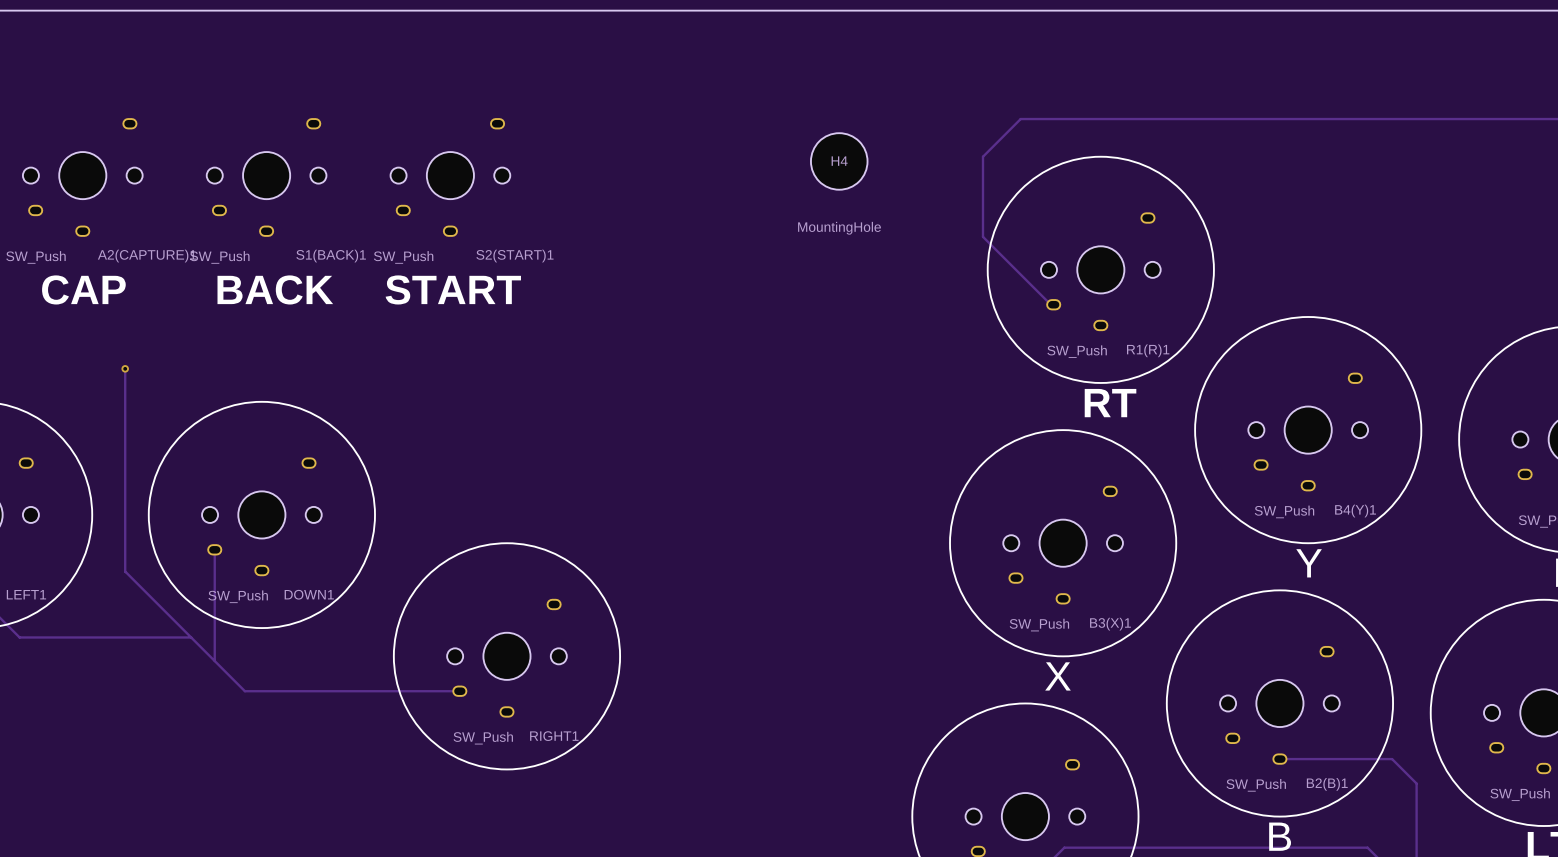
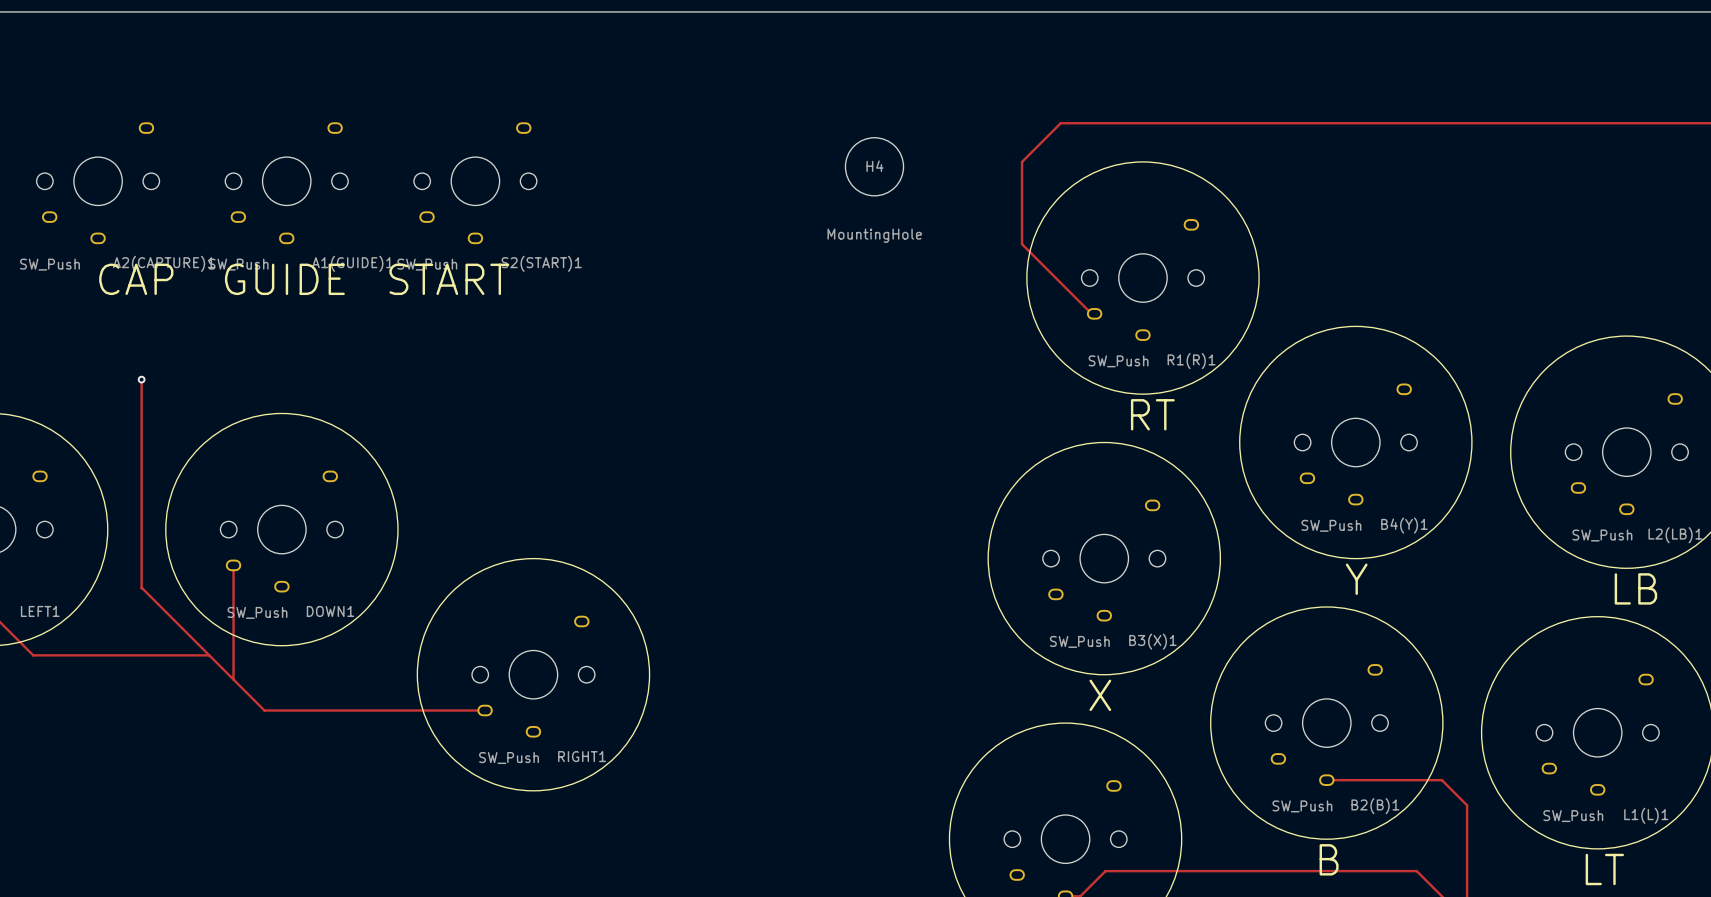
S1(BACK)1 name: S1(BACK)1 (331, 256) -> A1(GUIDE)1 (352, 263)
text: none -> GUIDE (284, 279)
text position: CAP (83, 289) -> CAP (136, 279)
text: BACK (275, 289) -> none
text position: START (453, 289) -> START (449, 279)

